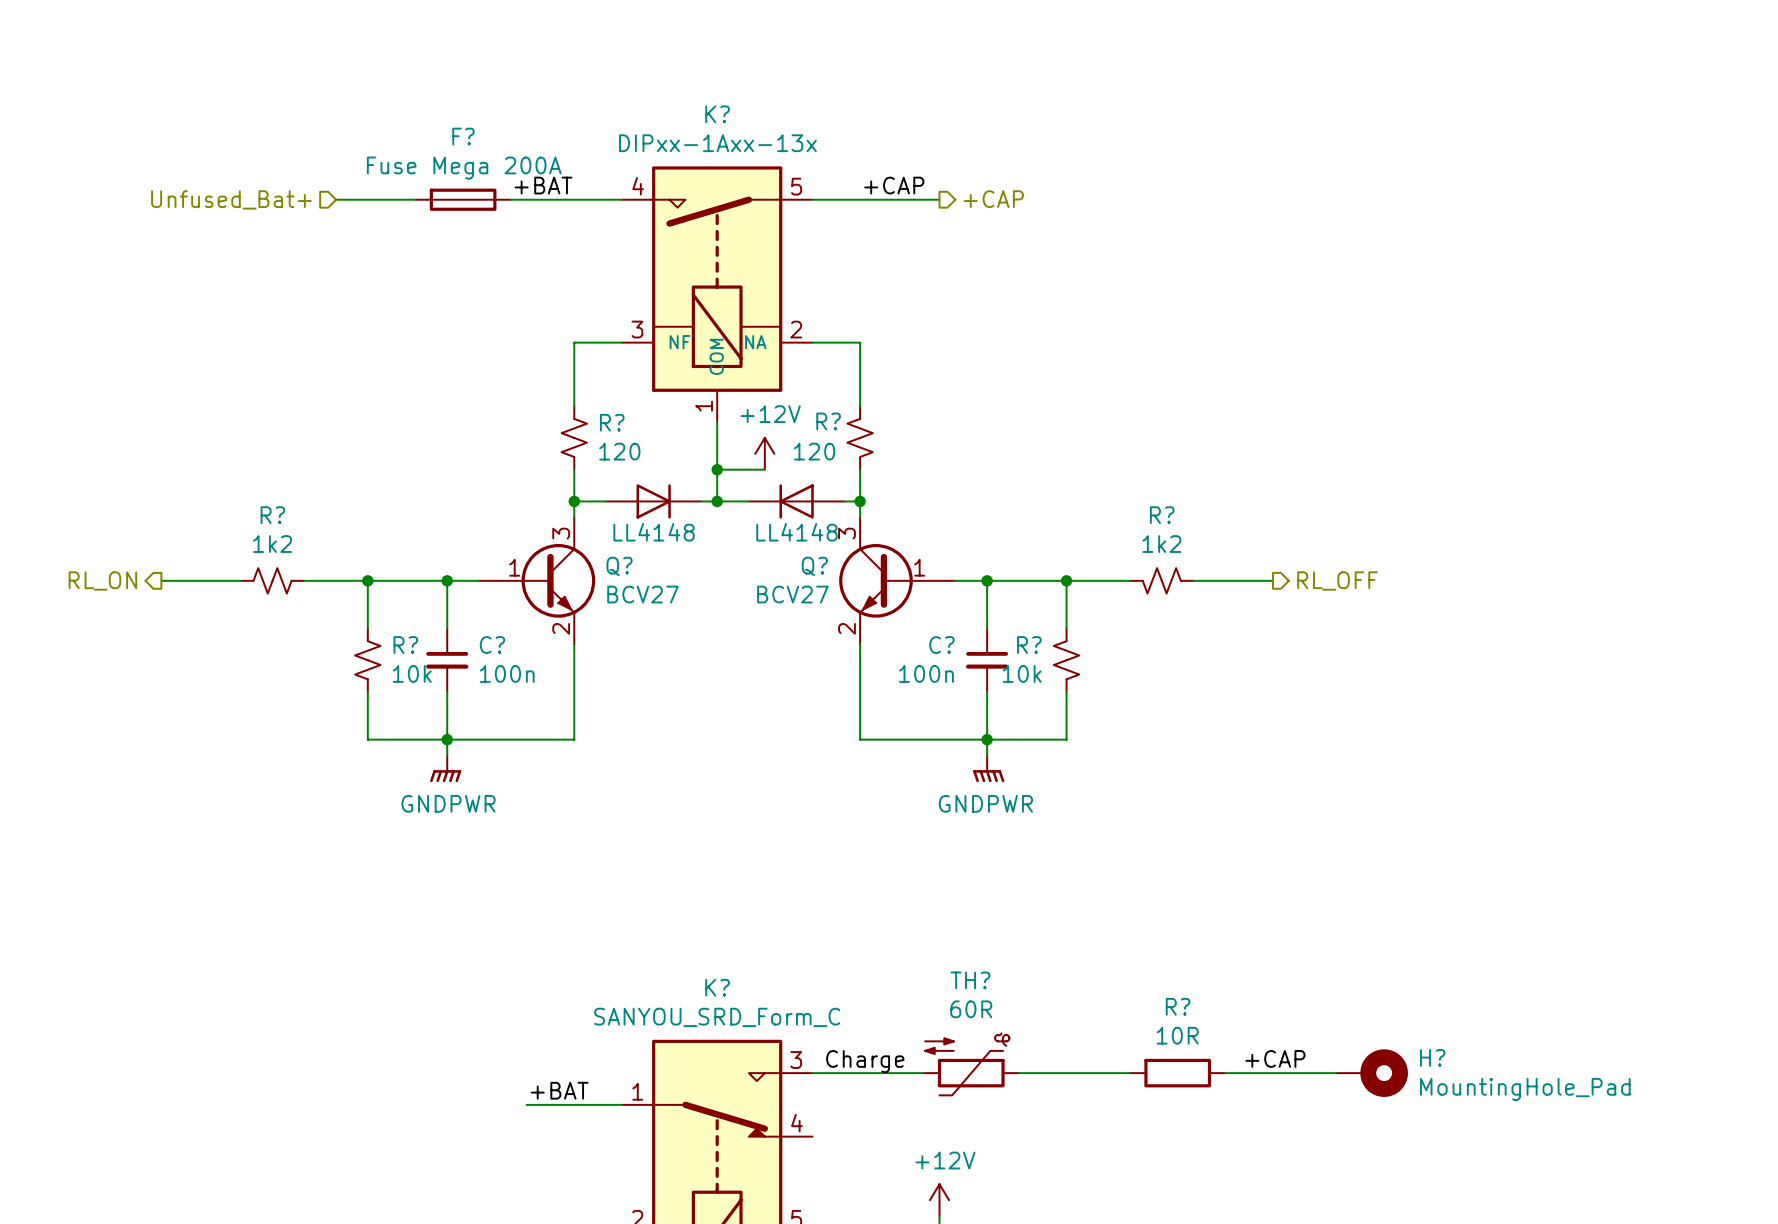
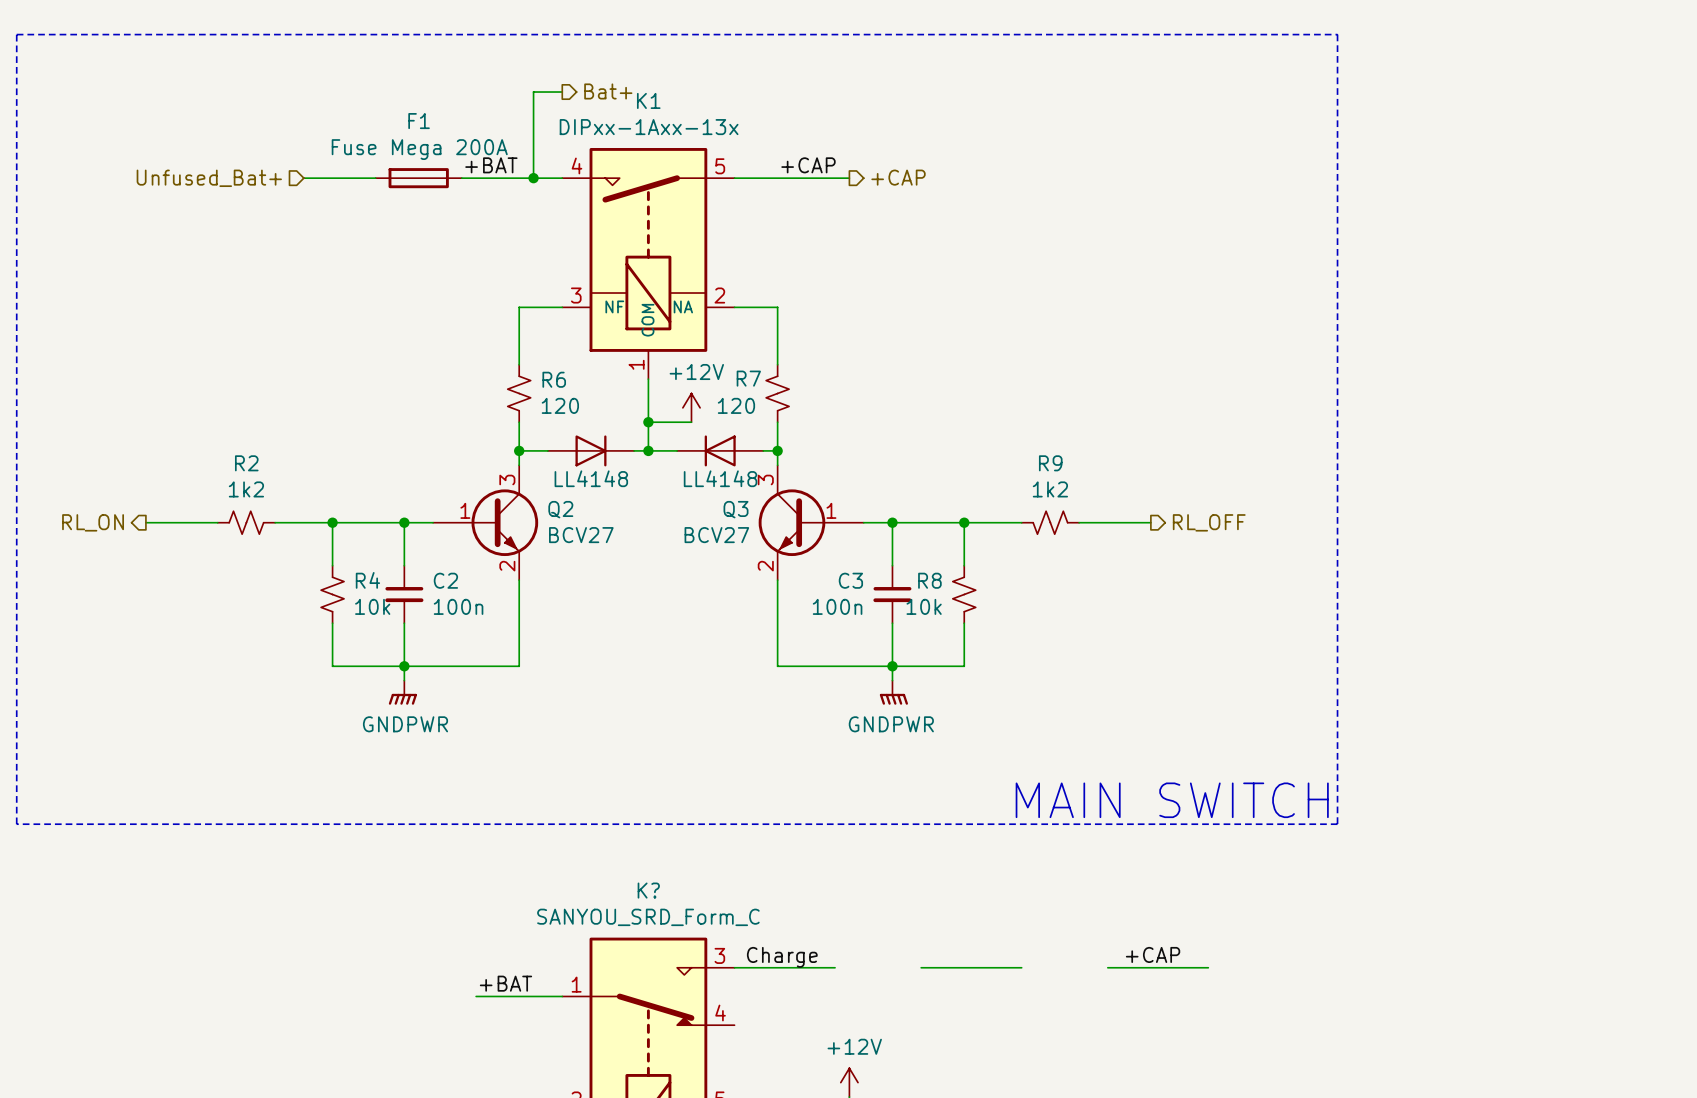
line: none -> (16, 34) (1337, 34) (1337, 824) (16, 824) (16, 34)
hierarchical label: none -> Bat+ (608, 91)
wire: none -> (562, 92) (533, 92) (533, 178)
K? name: K? (717, 114) -> K1 (648, 100)
F? name: F? (463, 136) -> F1 (419, 121)
junction: none -> (533, 178)
R? name: R? (828, 421) -> R7 (748, 378)
R? name: R? (612, 422) -> R6 (554, 379)
R? name: R? (272, 515) -> R2 (246, 463)
R? name: R? (1162, 515) -> R9 (1050, 463)
Q? name: Q? (619, 566) -> Q2 (560, 509)
Q? name: Q? (814, 566) -> Q3 (736, 509)
R? name: R? (405, 645) -> R4 (367, 580)
C? name: C? (492, 645) -> C2 (445, 580)
C? name: C? (941, 645) -> C3 (850, 580)
R? name: R? (1029, 645) -> R8 (929, 580)
text: none -> MAIN SWITCH (1172, 800)
TH?: 60R (971, 1064) -> none
R?: 10R (1177, 1073) -> none
H?: MountingHole_Pad (1372, 1073) -> none

